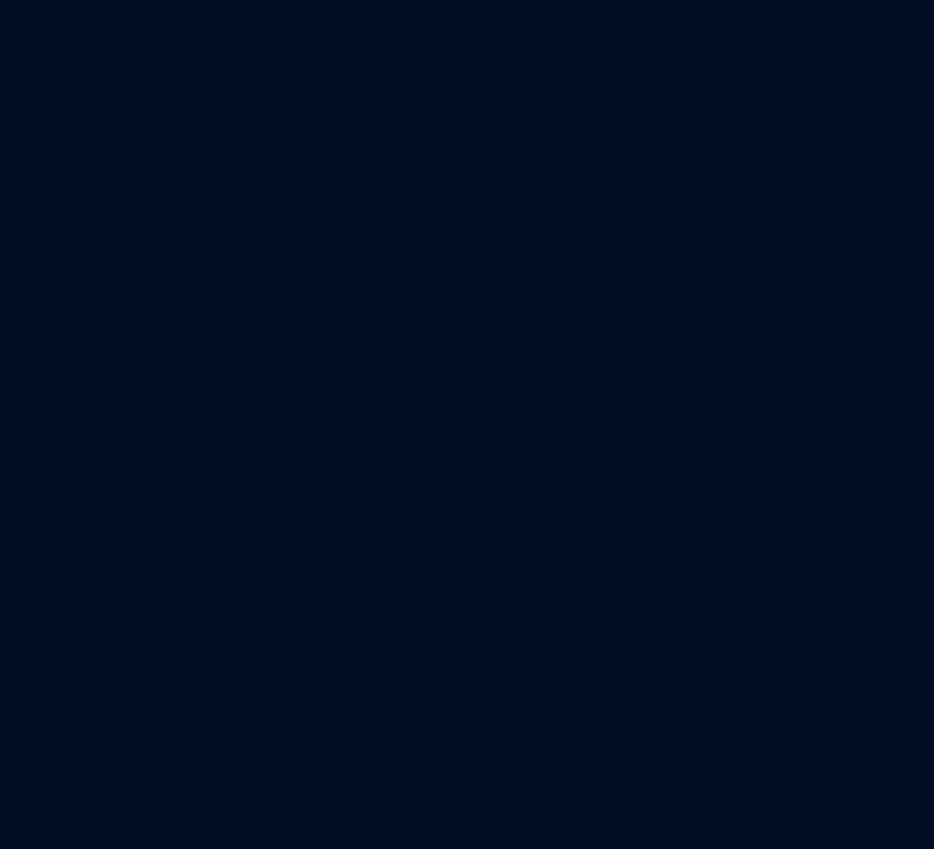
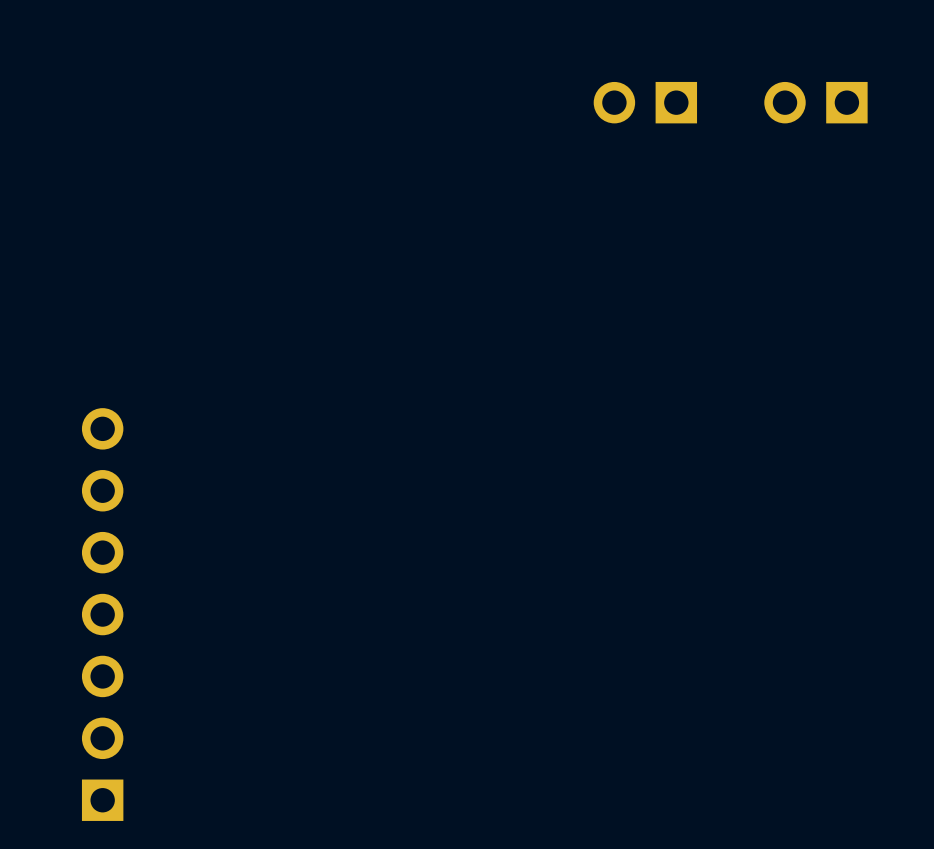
part: none -> (645, 102)
part: none -> (815, 102)
part: none -> (102, 614)

